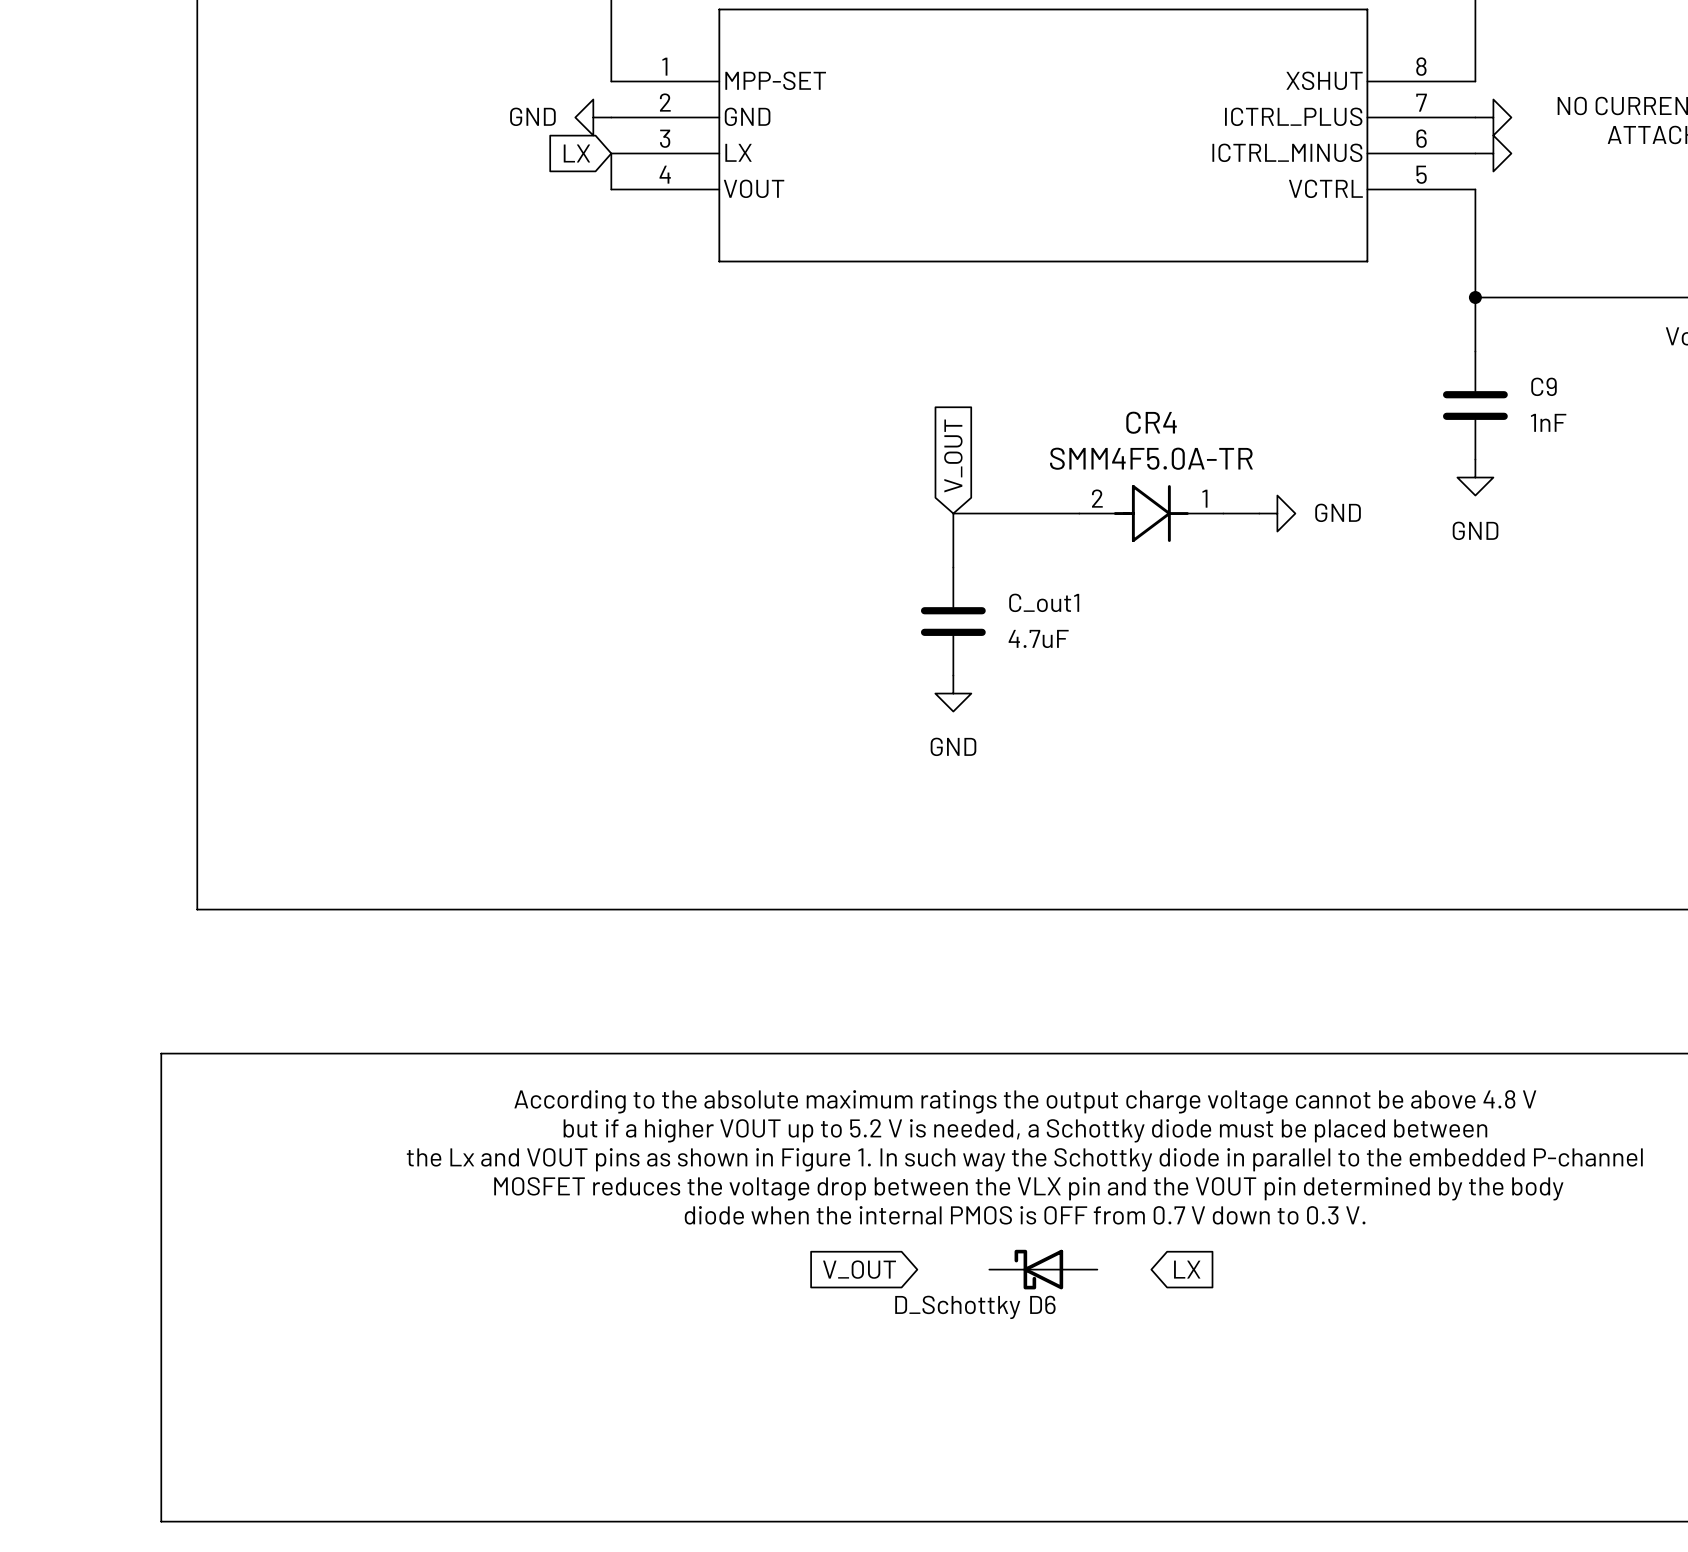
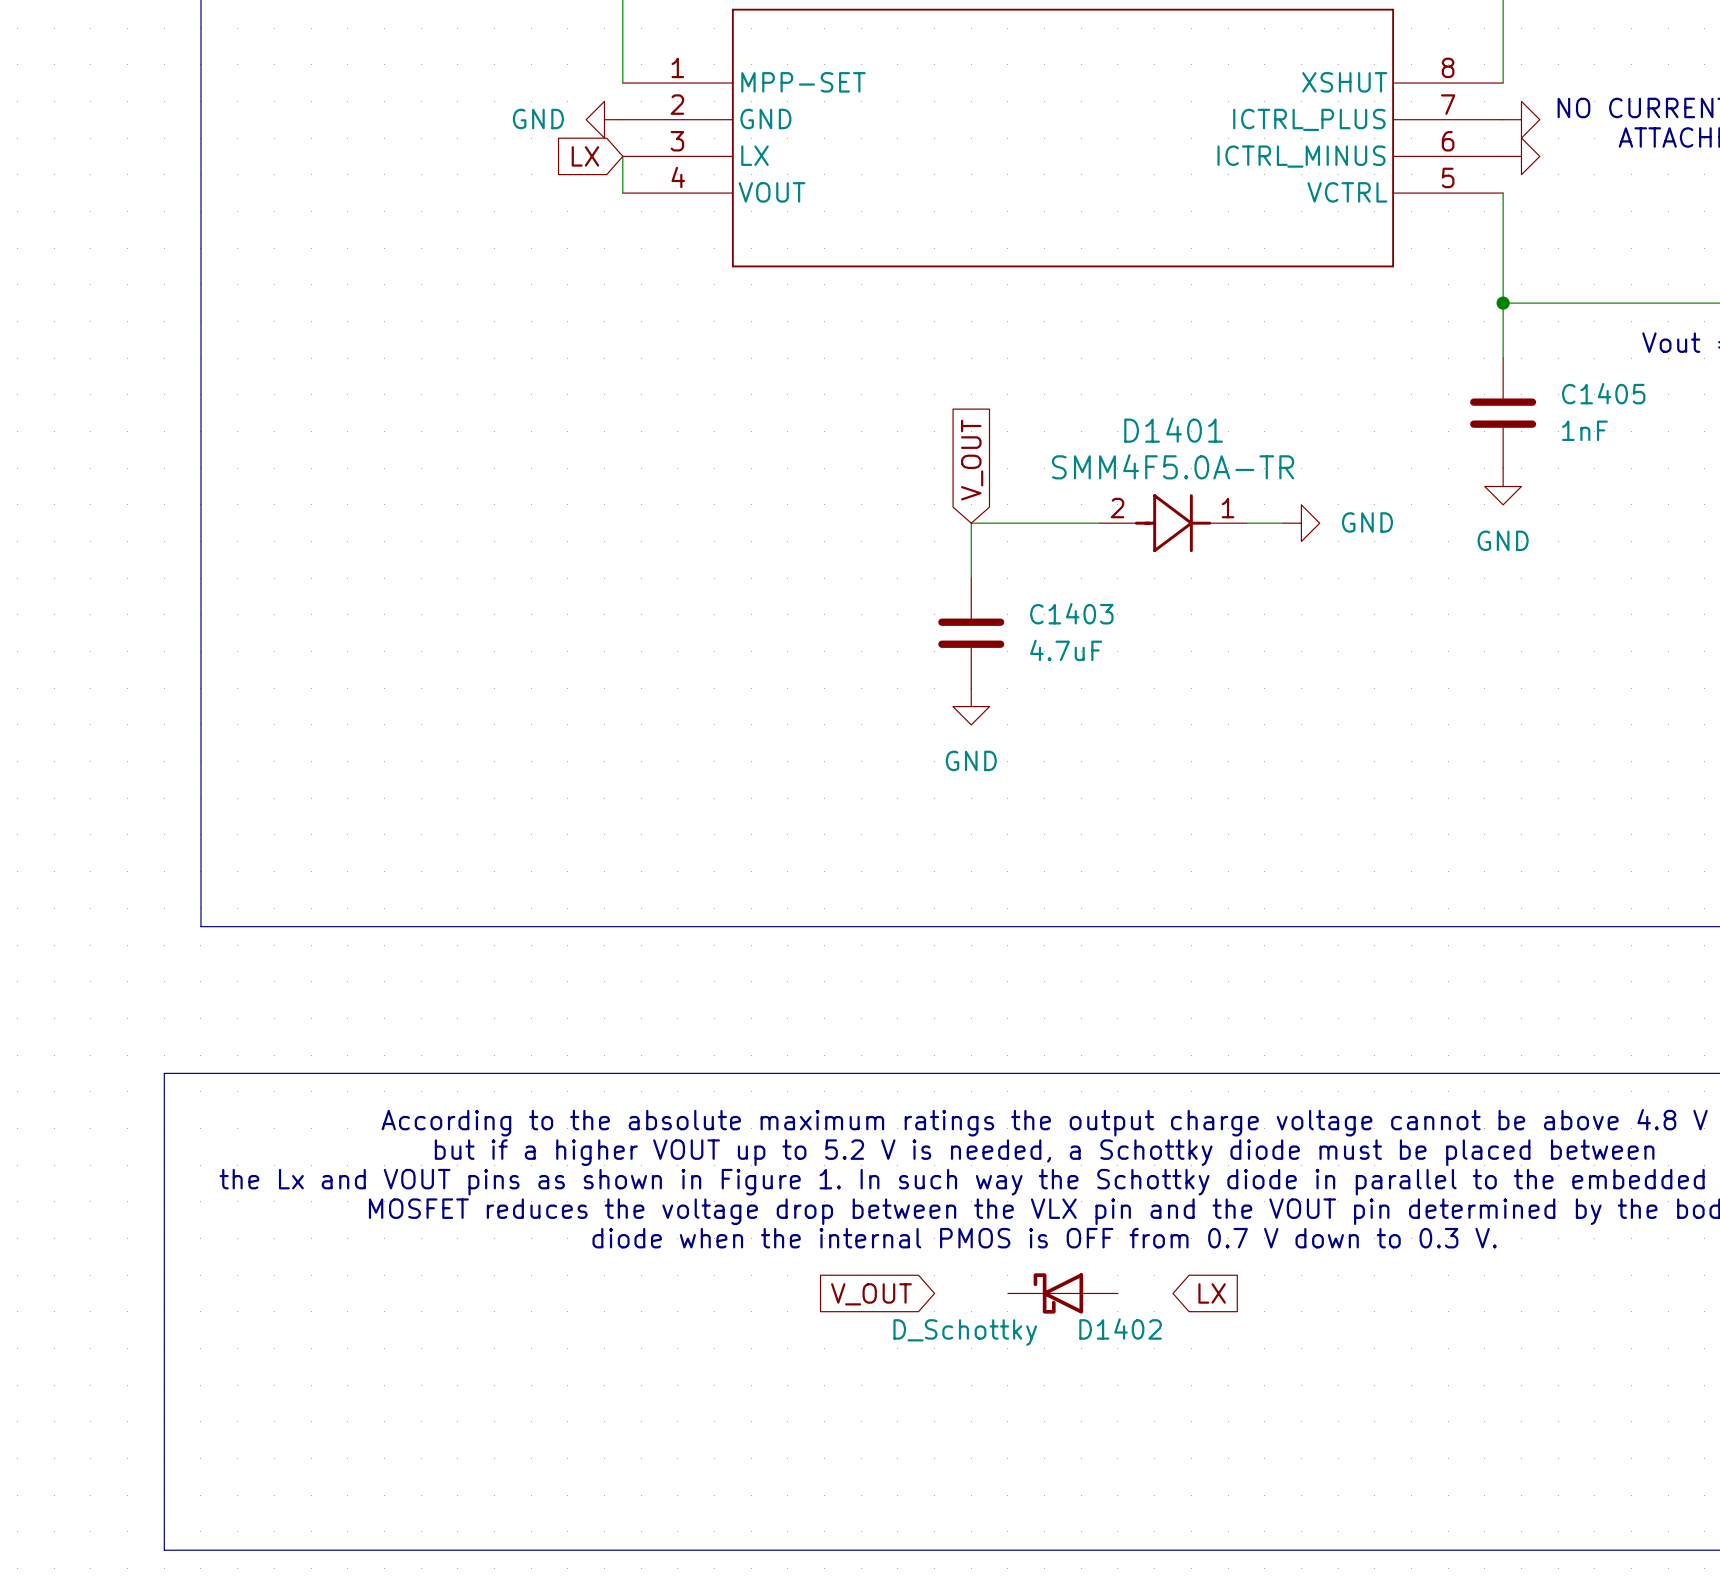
C9 name: C9 (1544, 386) -> C1405 (1603, 393)
CR4 name: CR4 (1151, 422) -> D1401 (1173, 430)
C_out1 name: C_out1 (1044, 602) -> C1403 (1071, 613)
D6 name: D6 (1042, 1304) -> D1402 (1120, 1329)

